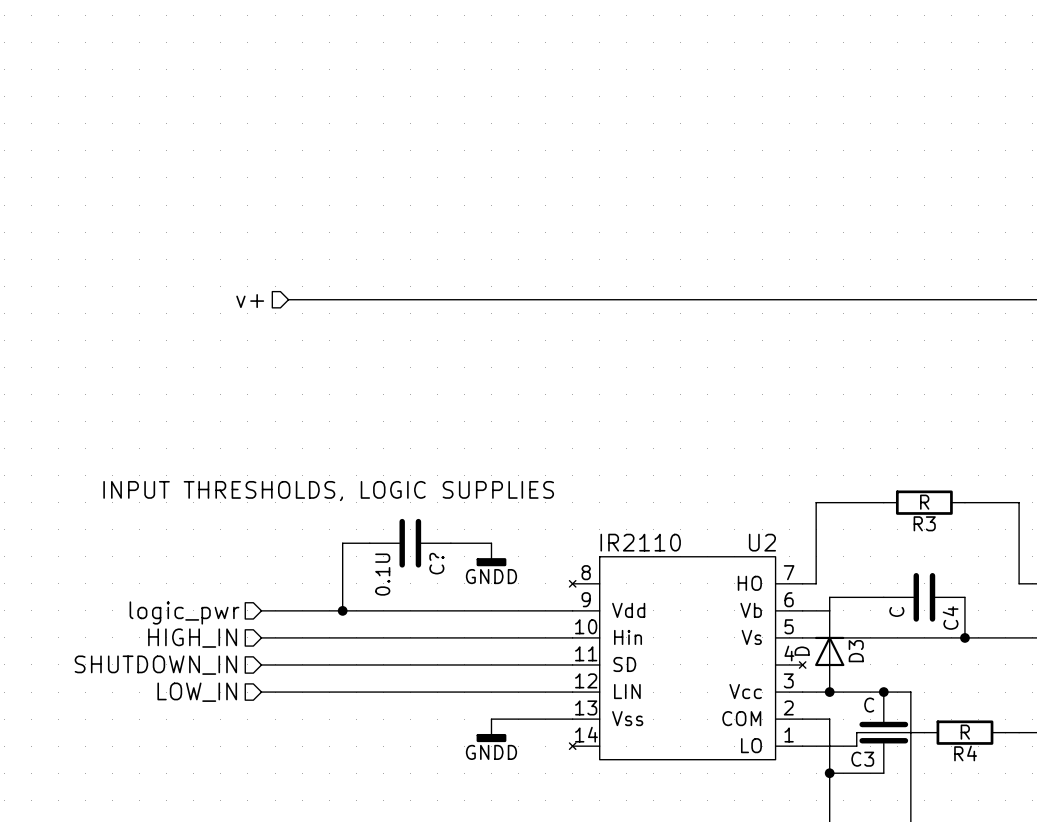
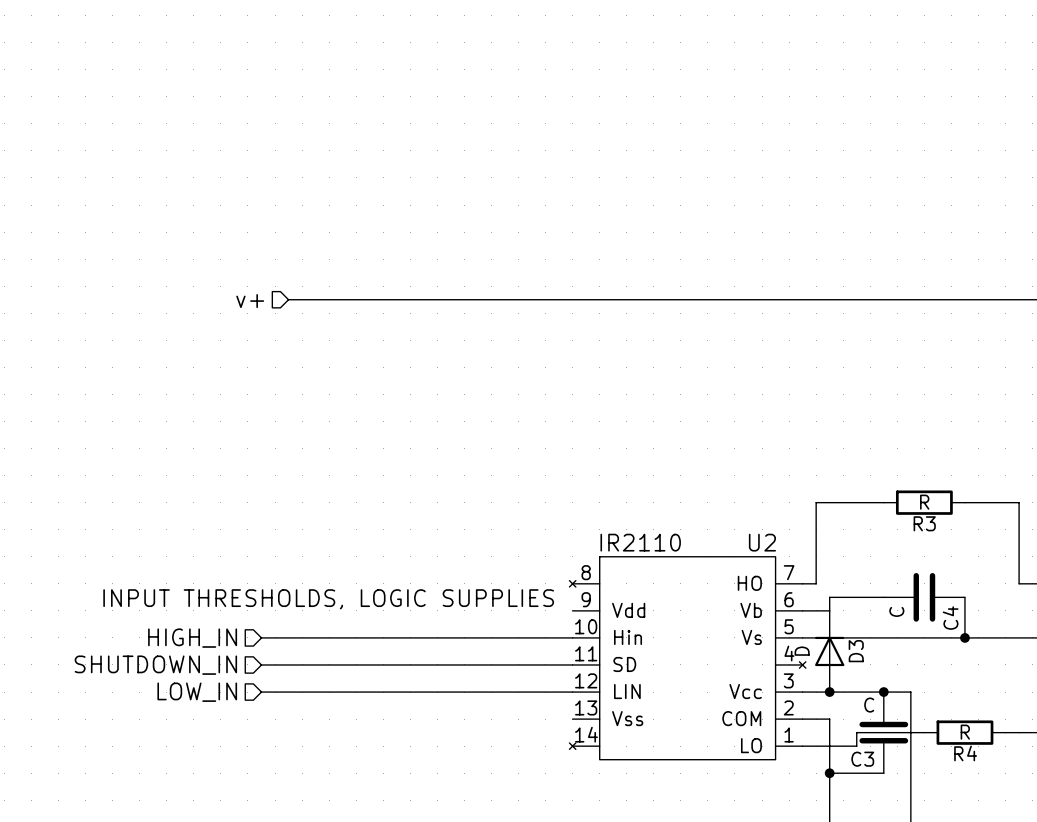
text position: INPUT THRESHOLDS, LOGIC SUPPLIES (328, 491) -> INPUT THRESHOLDS, LOGIC SUPPLIES (328, 599)
wire: (369, 543) (342, 543) (342, 610) -> none
C?: 0.1U (410, 543) -> none
wire: (450, 543) (491, 543) -> none
power symbol: GNDD (491, 554) -> none
wire: (261, 610) (572, 610) -> none
junction: (342, 610) -> none
hierarchical label: logic_pwr (184, 612) -> none
wire: (491, 719) (572, 719) -> none
power symbol: GNDD (491, 730) -> none

